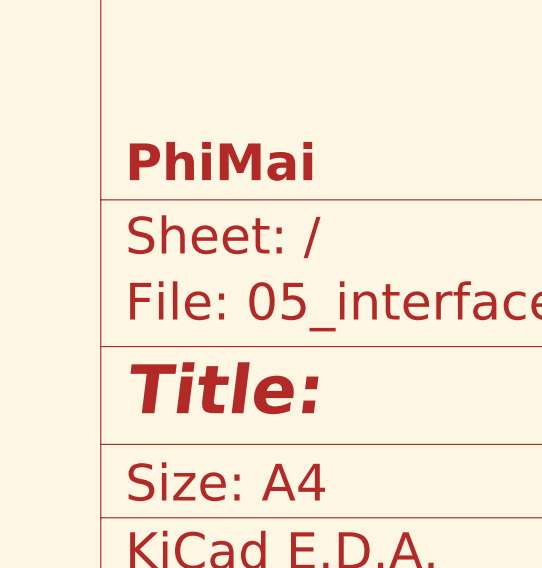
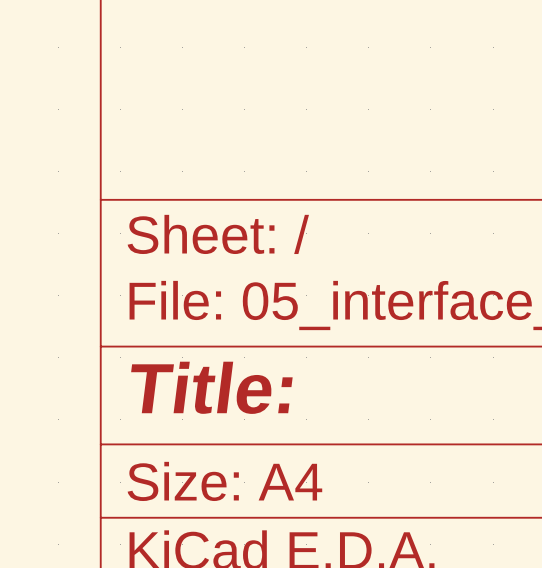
title block: PhiMai (221, 161) -> none

